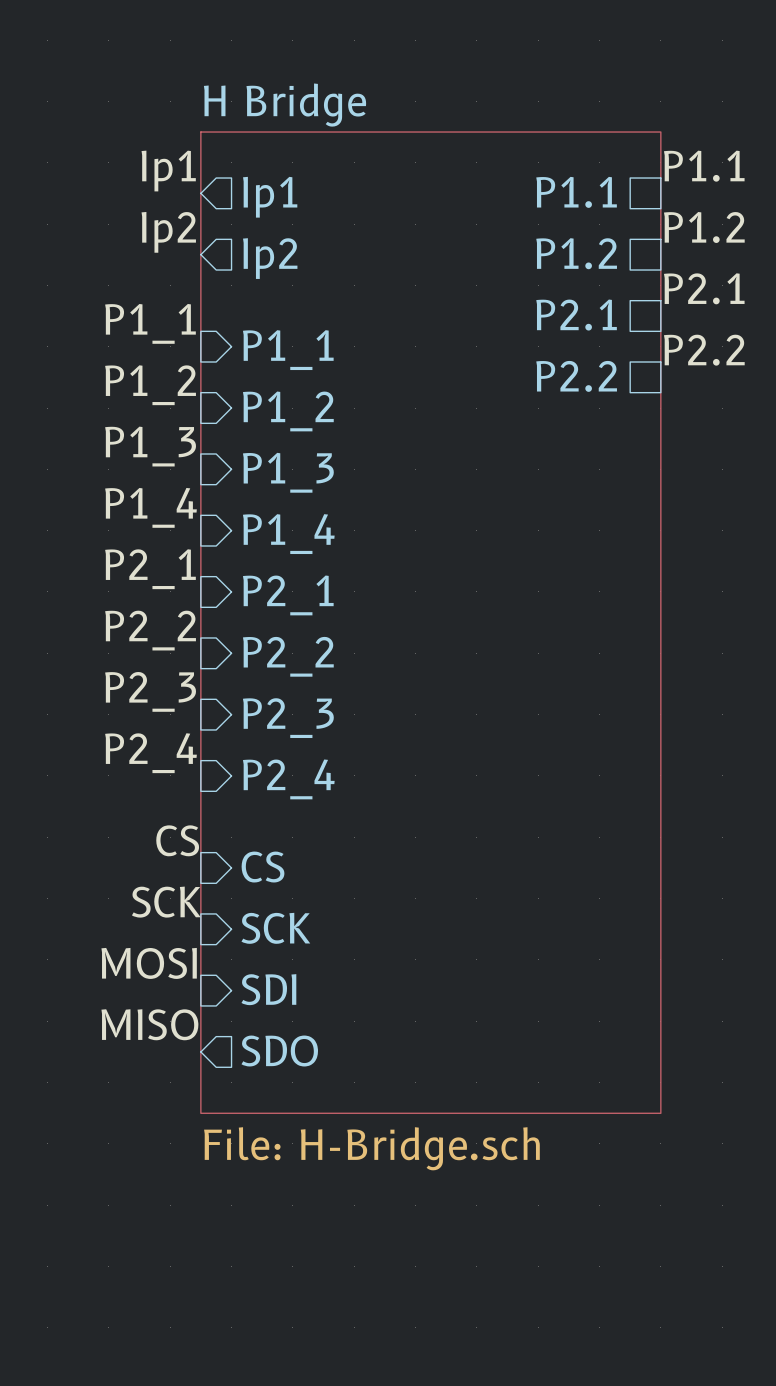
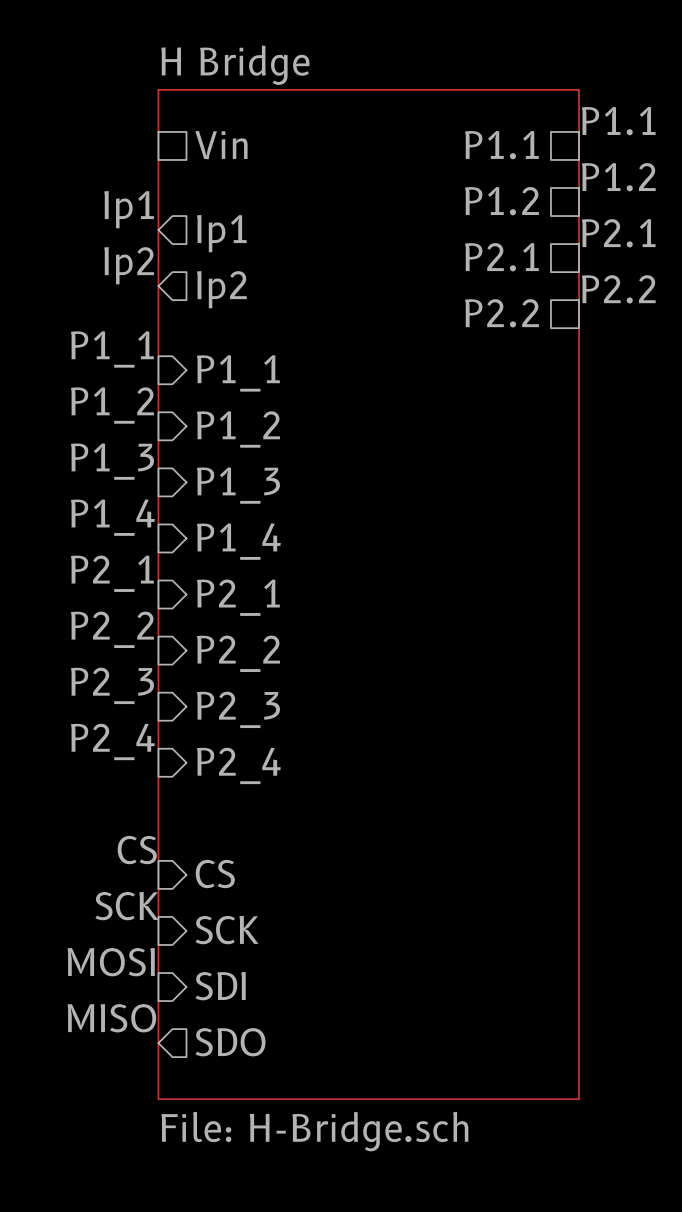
label position: Ip1 (168, 171) -> Ip1 (129, 209)
sheet pin shape: output (270, 197) -> passive (221, 145)
sheet pin: Ip1 (270, 197) -> Vin (221, 145)
label: Ip2 (168, 232) -> none
sheet pin: Ip2 (270, 258) -> Ip1 (221, 233)
label: P1_1 (150, 323) -> Ip2 (129, 265)
sheet pin shape: input (288, 350) -> output (221, 289)
sheet pin: P1_1 (288, 350) -> Ip2 (221, 289)
label position: P1_2 (150, 385) -> P1_2 (112, 405)
sheet pin position: P1_2 (288, 411) -> P1_2 (238, 429)
label: none -> P1_1 (112, 349)
sheet pin: none -> P1_1 (238, 373)
label position: P1_3 (150, 446) -> P1_3 (112, 461)
sheet pin position: P1_3 (288, 472) -> P1_3 (238, 485)
label position: P1_4 (150, 507) -> P1_4 (112, 517)
sheet pin position: P1_4 (288, 534) -> P1_4 (238, 541)
label position: P2_1 (150, 569) -> P2_1 (112, 573)
sheet pin position: P2_1 (288, 595) -> P2_1 (238, 597)
sheet H Bridge: File: H-Bridge.sch (430, 622) -> none
label position: P2_2 (150, 630) -> P2_2 (112, 629)
sheet pin position: P2_2 (288, 656) -> P2_2 (238, 653)
sheet H Bridge: none -> File: H-Bridge.sch (368, 594)
label position: P2_3 (150, 691) -> P2_3 (112, 685)
sheet pin position: P2_3 (288, 718) -> P2_3 (238, 709)
label: P2_4 (150, 753) -> none
sheet pin: P2_4 (288, 779) -> none
label: CS (177, 840) -> P2_4 (112, 741)
sheet pin: CS (263, 867) -> P2_4 (238, 765)
label: SCK (166, 902) -> none
sheet pin: SCK (275, 928) -> none
label: MOSI (149, 963) -> CS (137, 850)
sheet pin: SDI (268, 989) -> CS (215, 874)
label: MISO (149, 1024) -> SCK (126, 906)
sheet pin shape: output (279, 1051) -> input (227, 930)
sheet pin: SDO (279, 1051) -> SCK (227, 930)
label: none -> MOSI (111, 962)
sheet pin: none -> SDI (220, 986)
label: none -> MISO (111, 1018)
sheet pin: none -> SDO (230, 1042)

